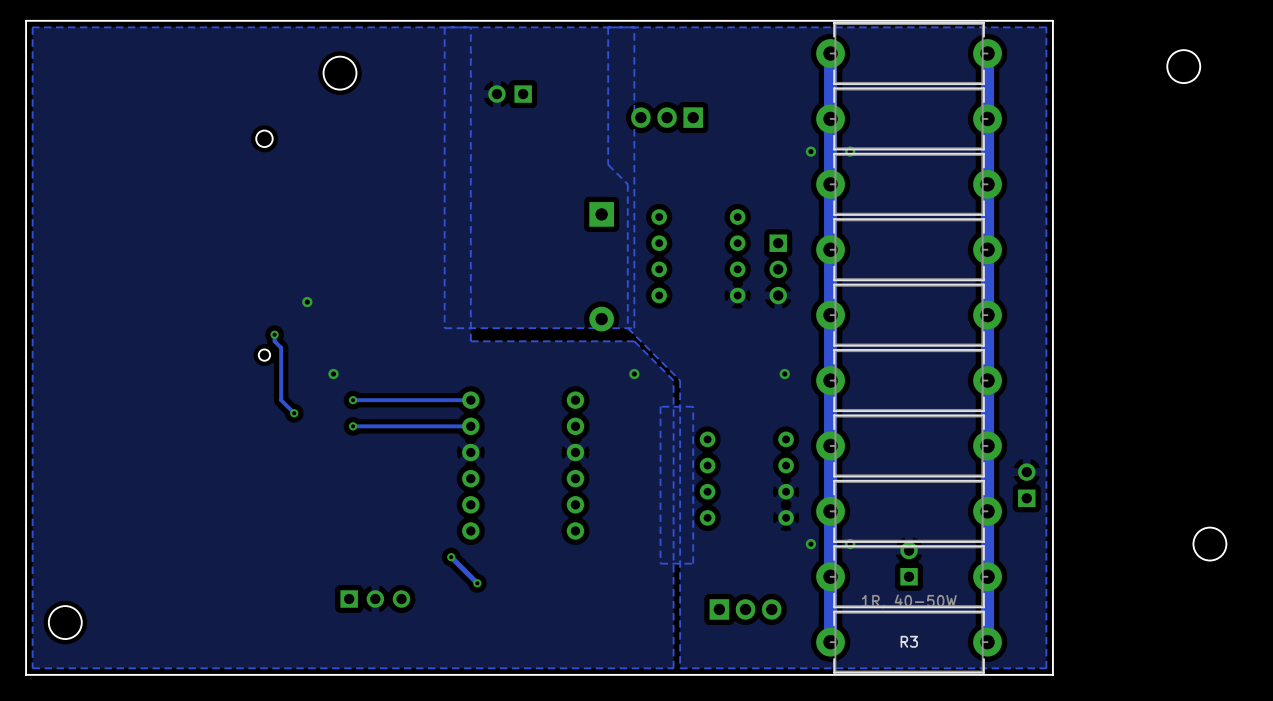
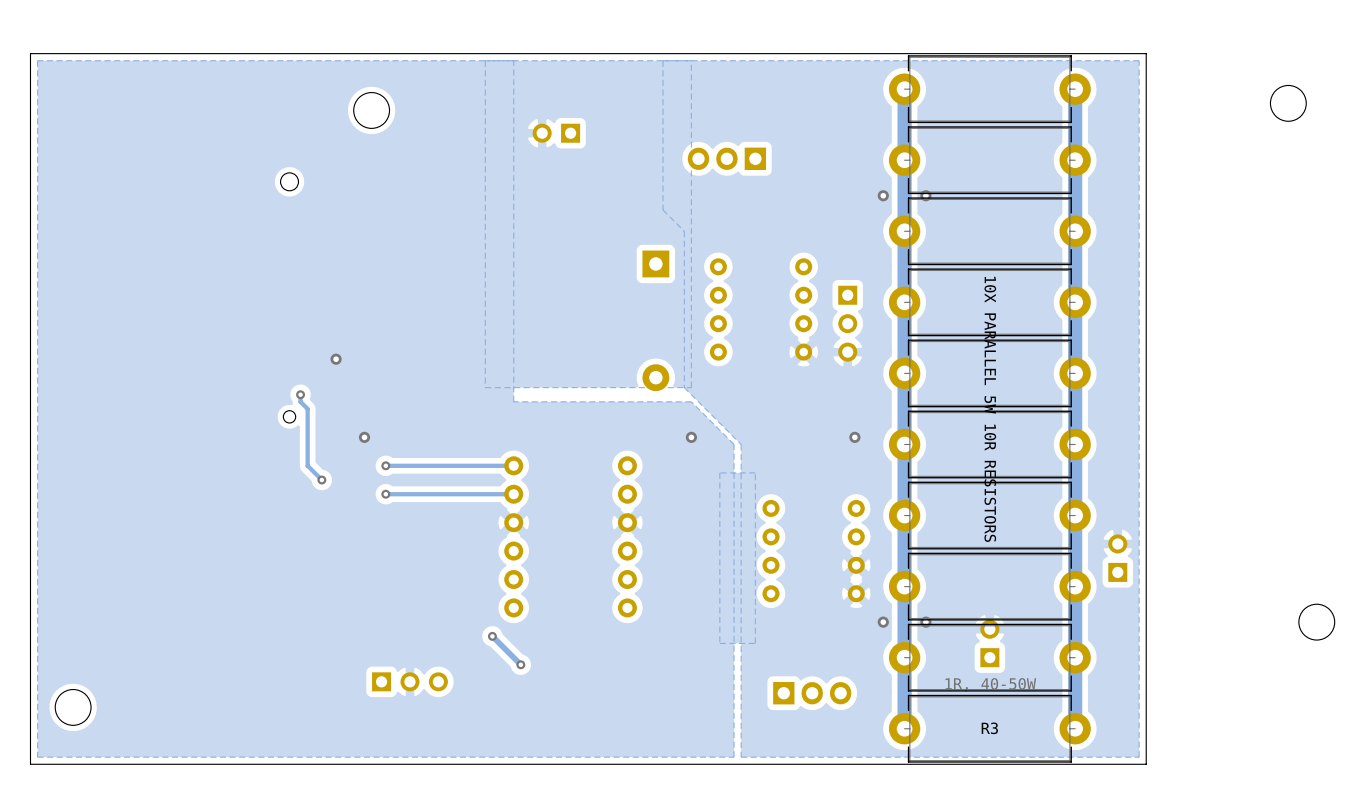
text: none -> 10X PARALLEL 5W 10R RESISTORS (990, 409)

